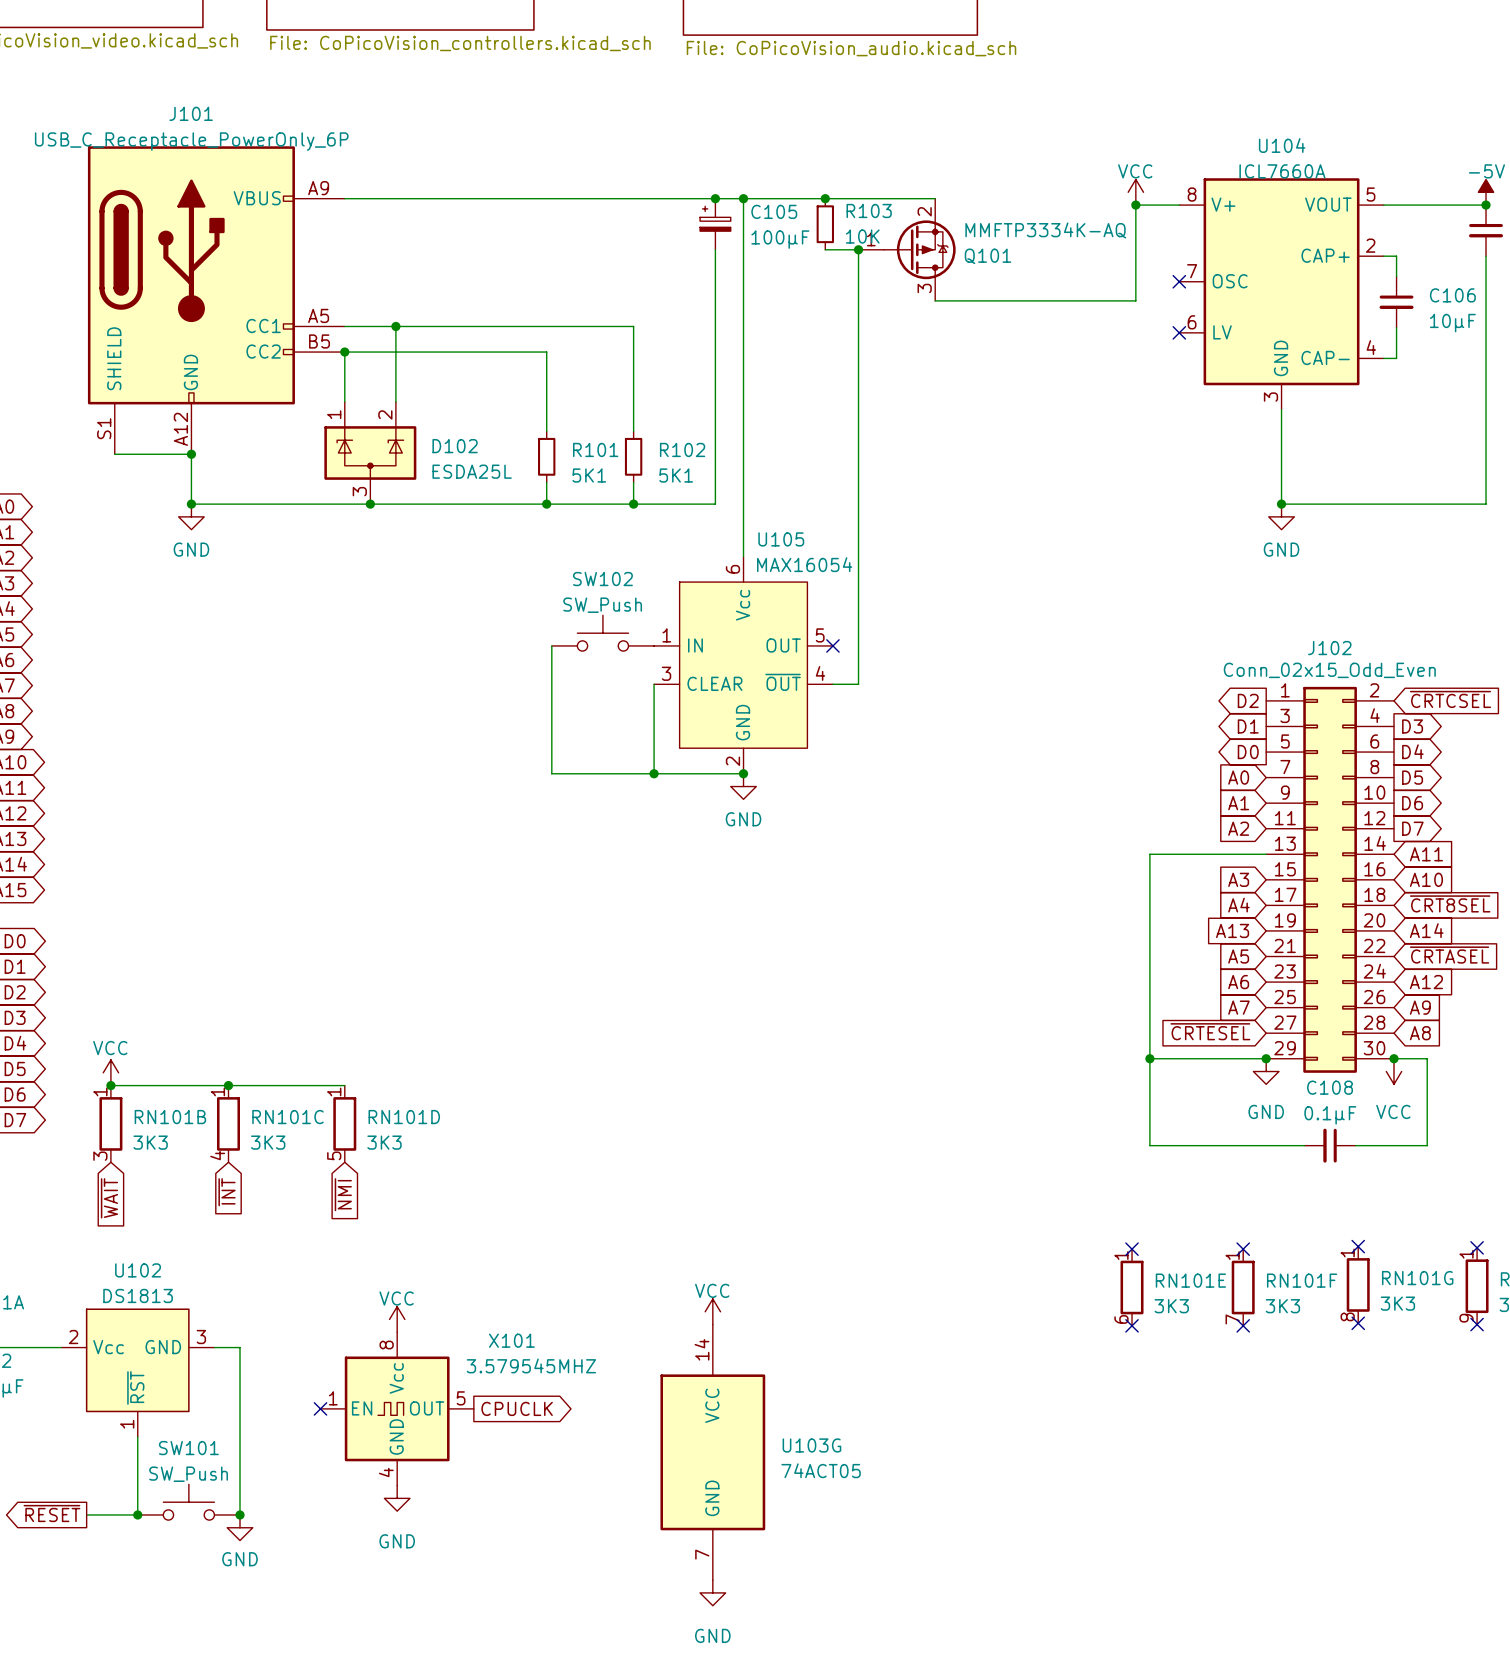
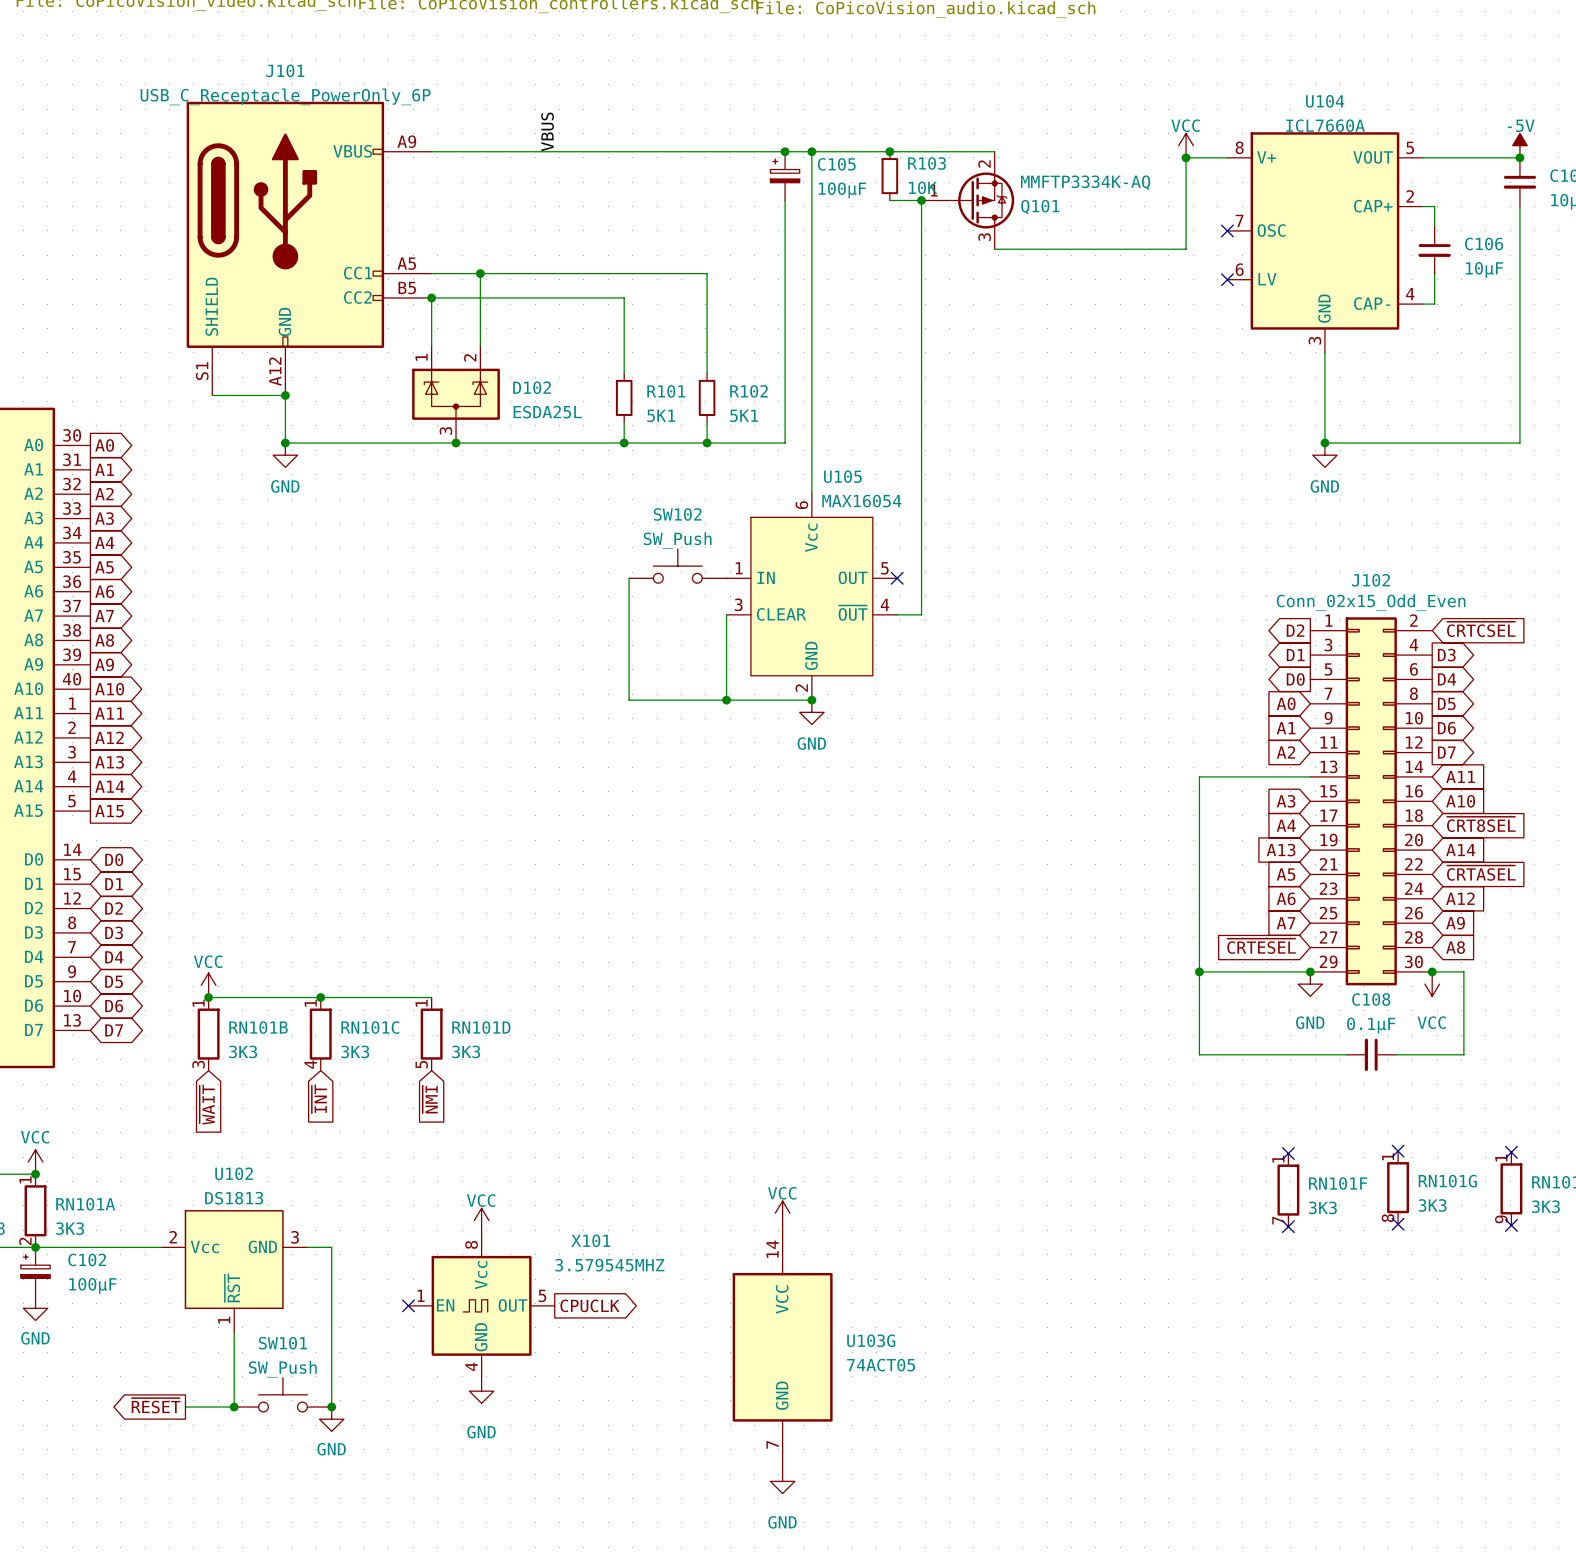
label: none -> VBUS (547, 131)
no-connect mark: (1132, 1249) -> none
RN101E: 3K3 (1132, 1287) -> none
no-connect mark: (1132, 1325) -> none

